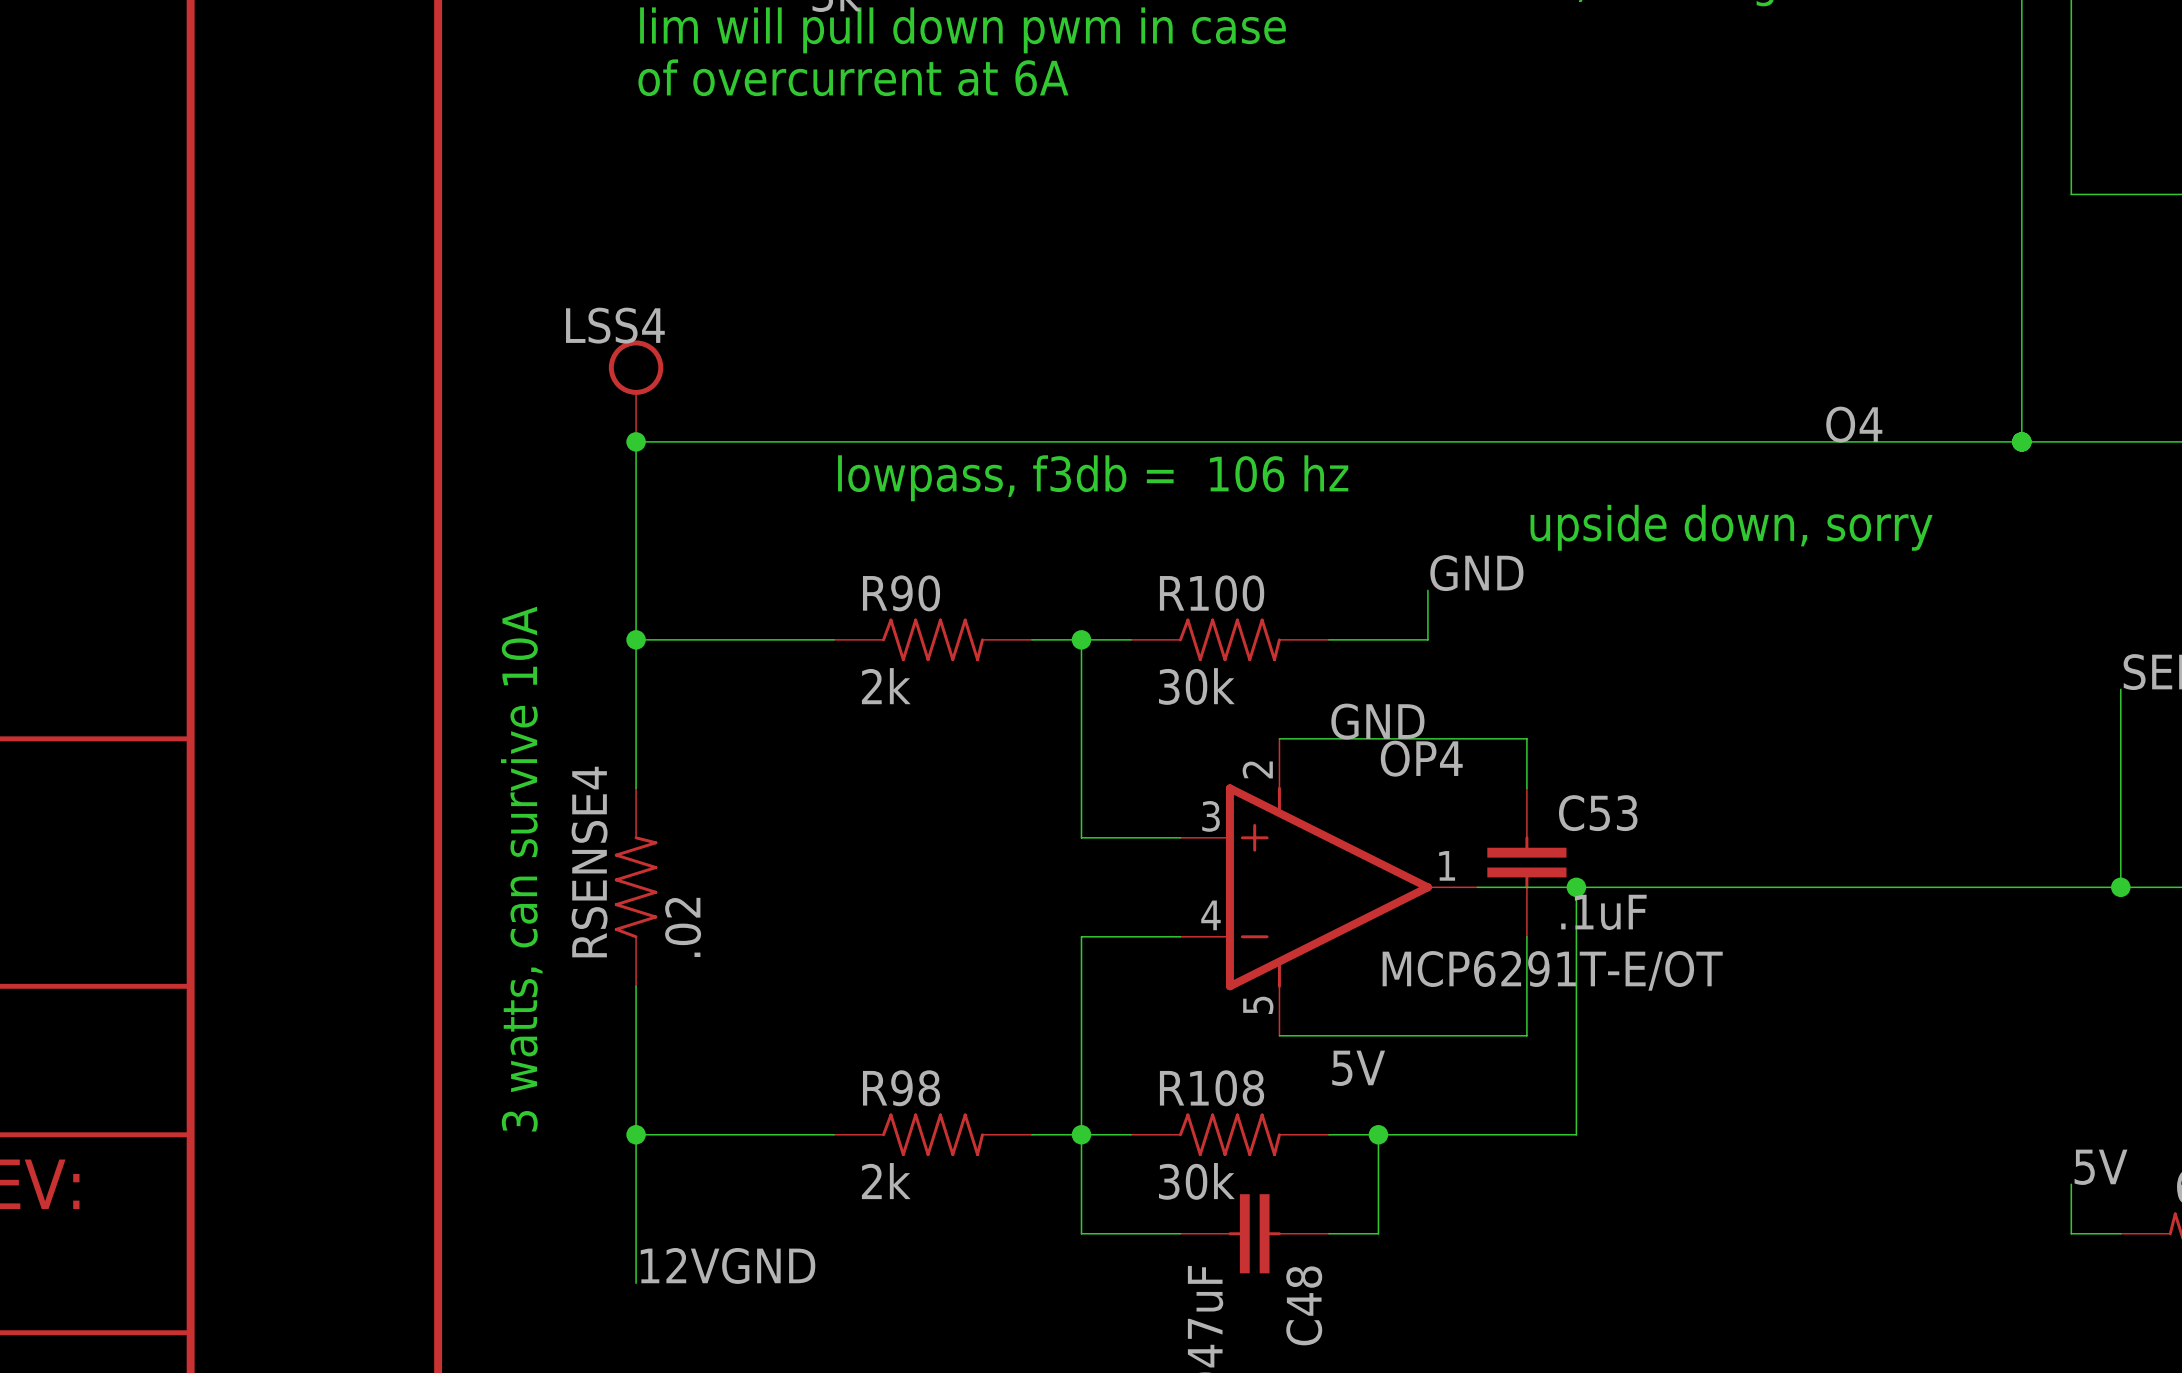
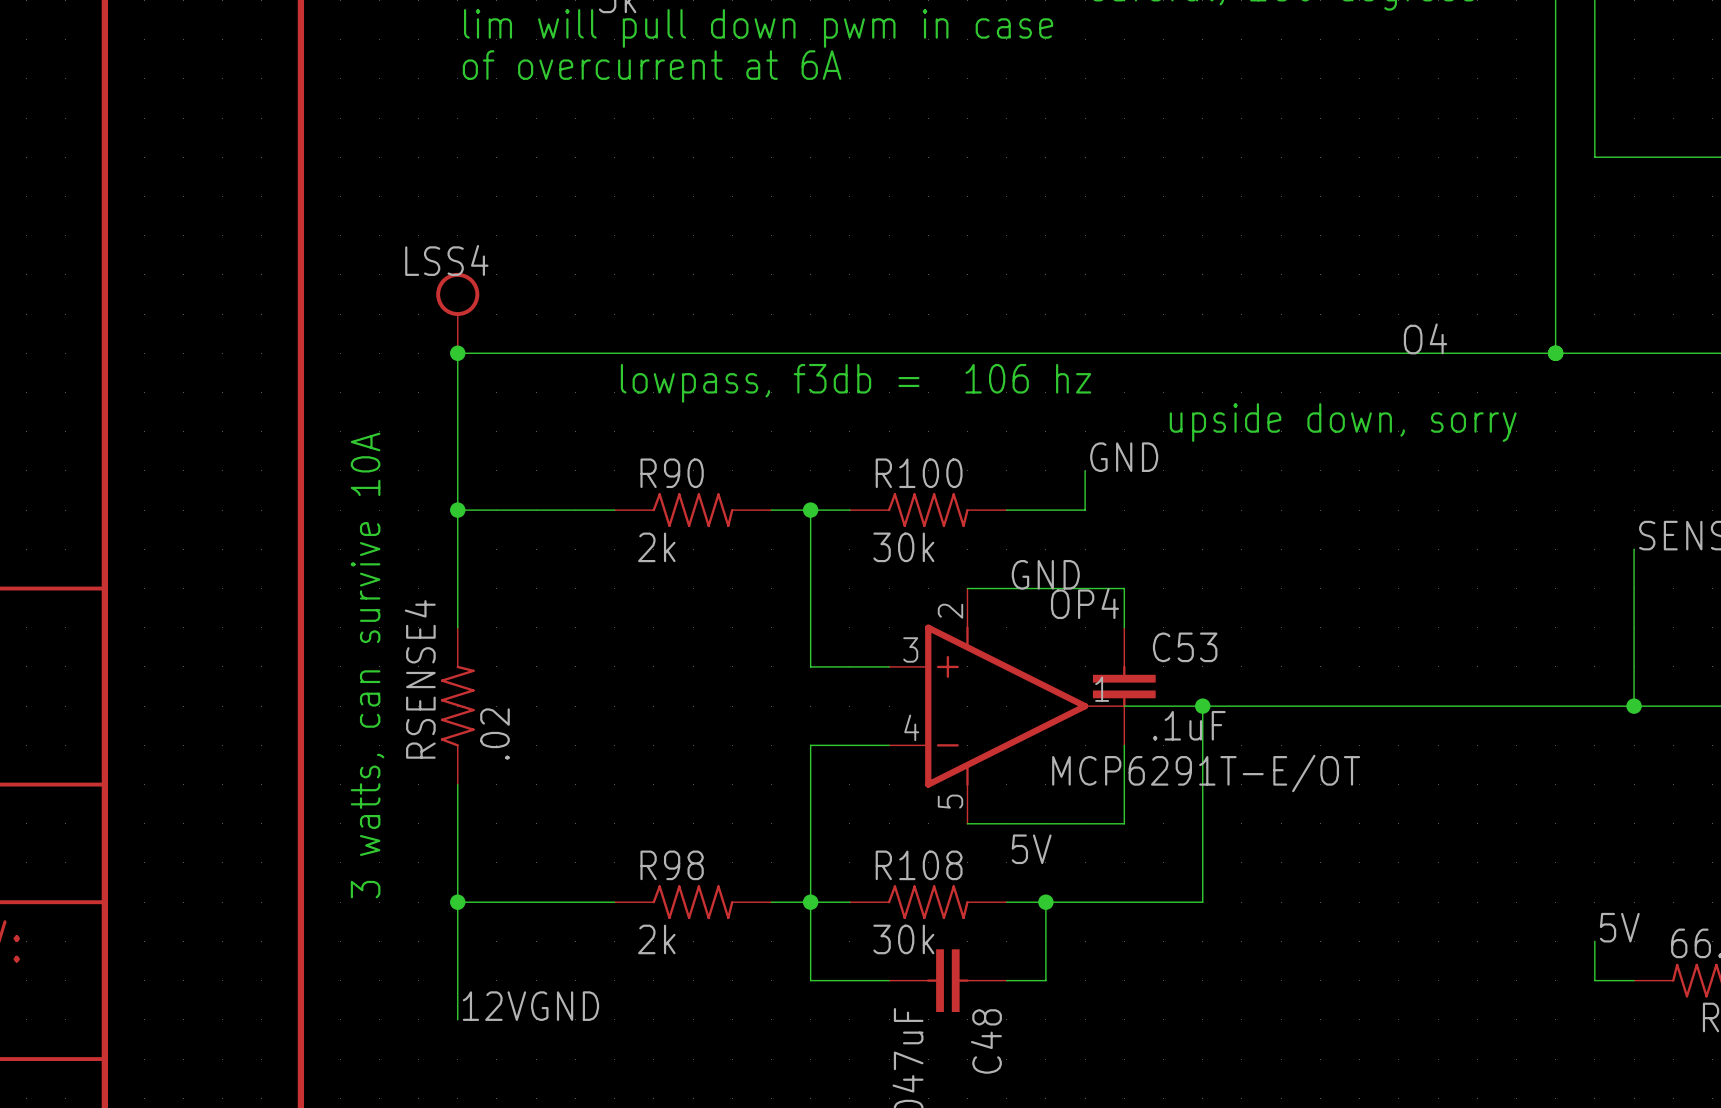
wire: (1477, 738) (1526, 738) (1526, 788) -> (1124, 588) (1124, 627)
C53 position: (1526, 862) -> (1124, 686)
wire: (1526, 936) (1526, 1035) (1477, 1035) -> (1124, 745) (1124, 823)

